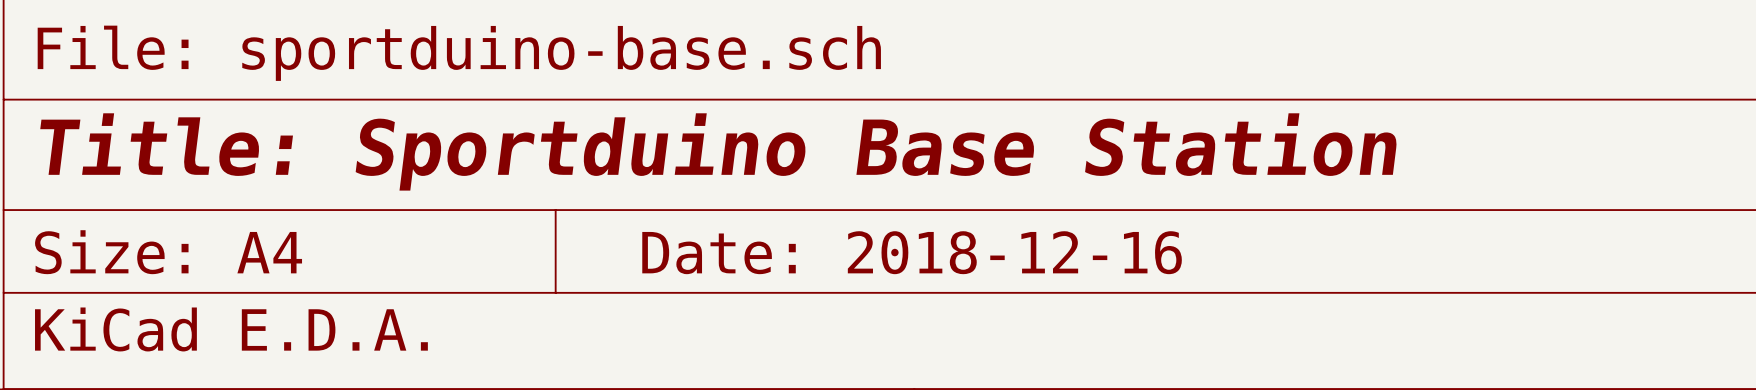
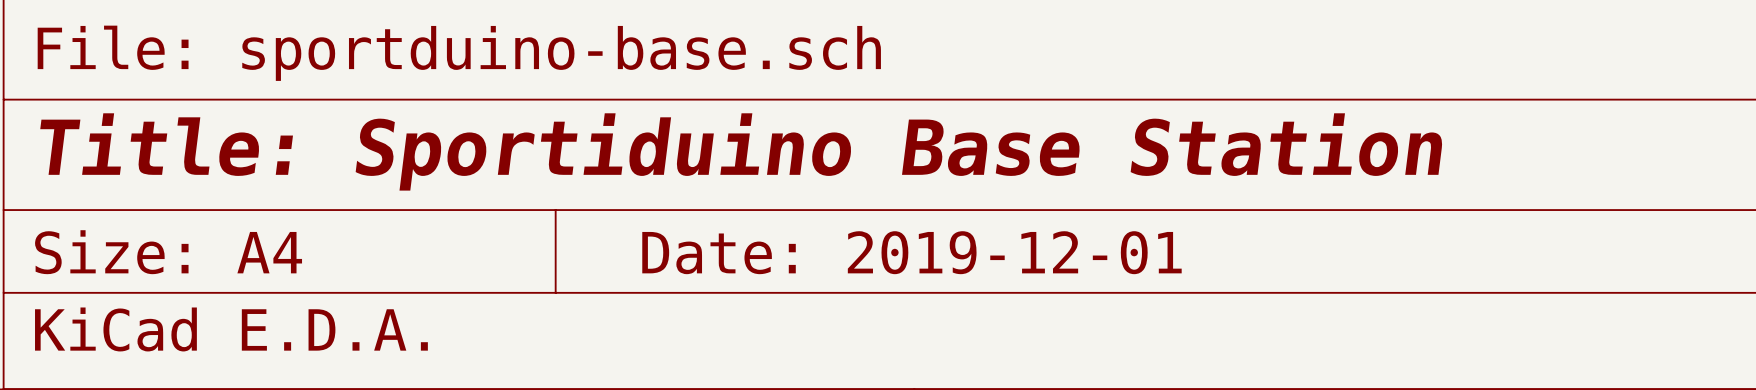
title block: Title: Sportduino Base Station (718, 151) -> Title: Sportiduino Base Station (741, 151)
title block: Date: 2018-12-16 (912, 252) -> Date: 2019-12-01 (911, 252)

